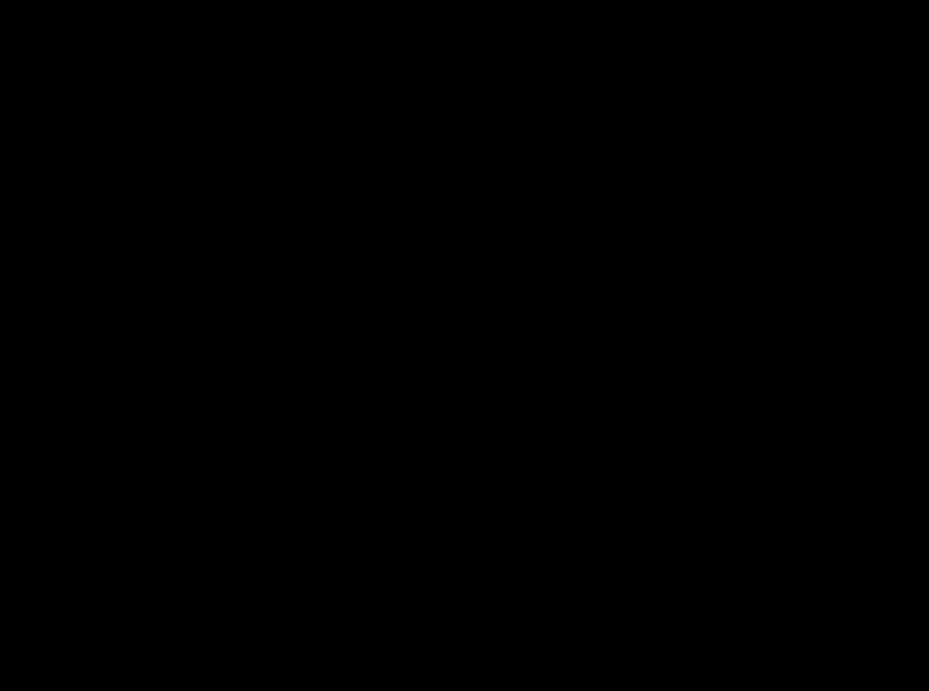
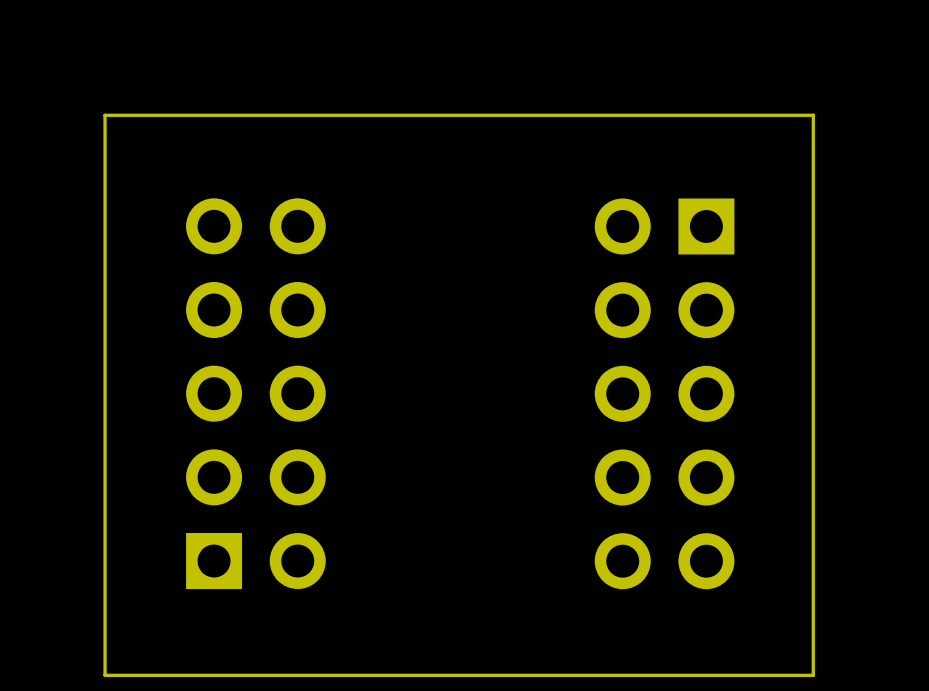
board edge: none -> (813, 115) (105, 115) (105, 675) (813, 675) (813, 115)
part: none -> (255, 393)
part: none -> (664, 393)

